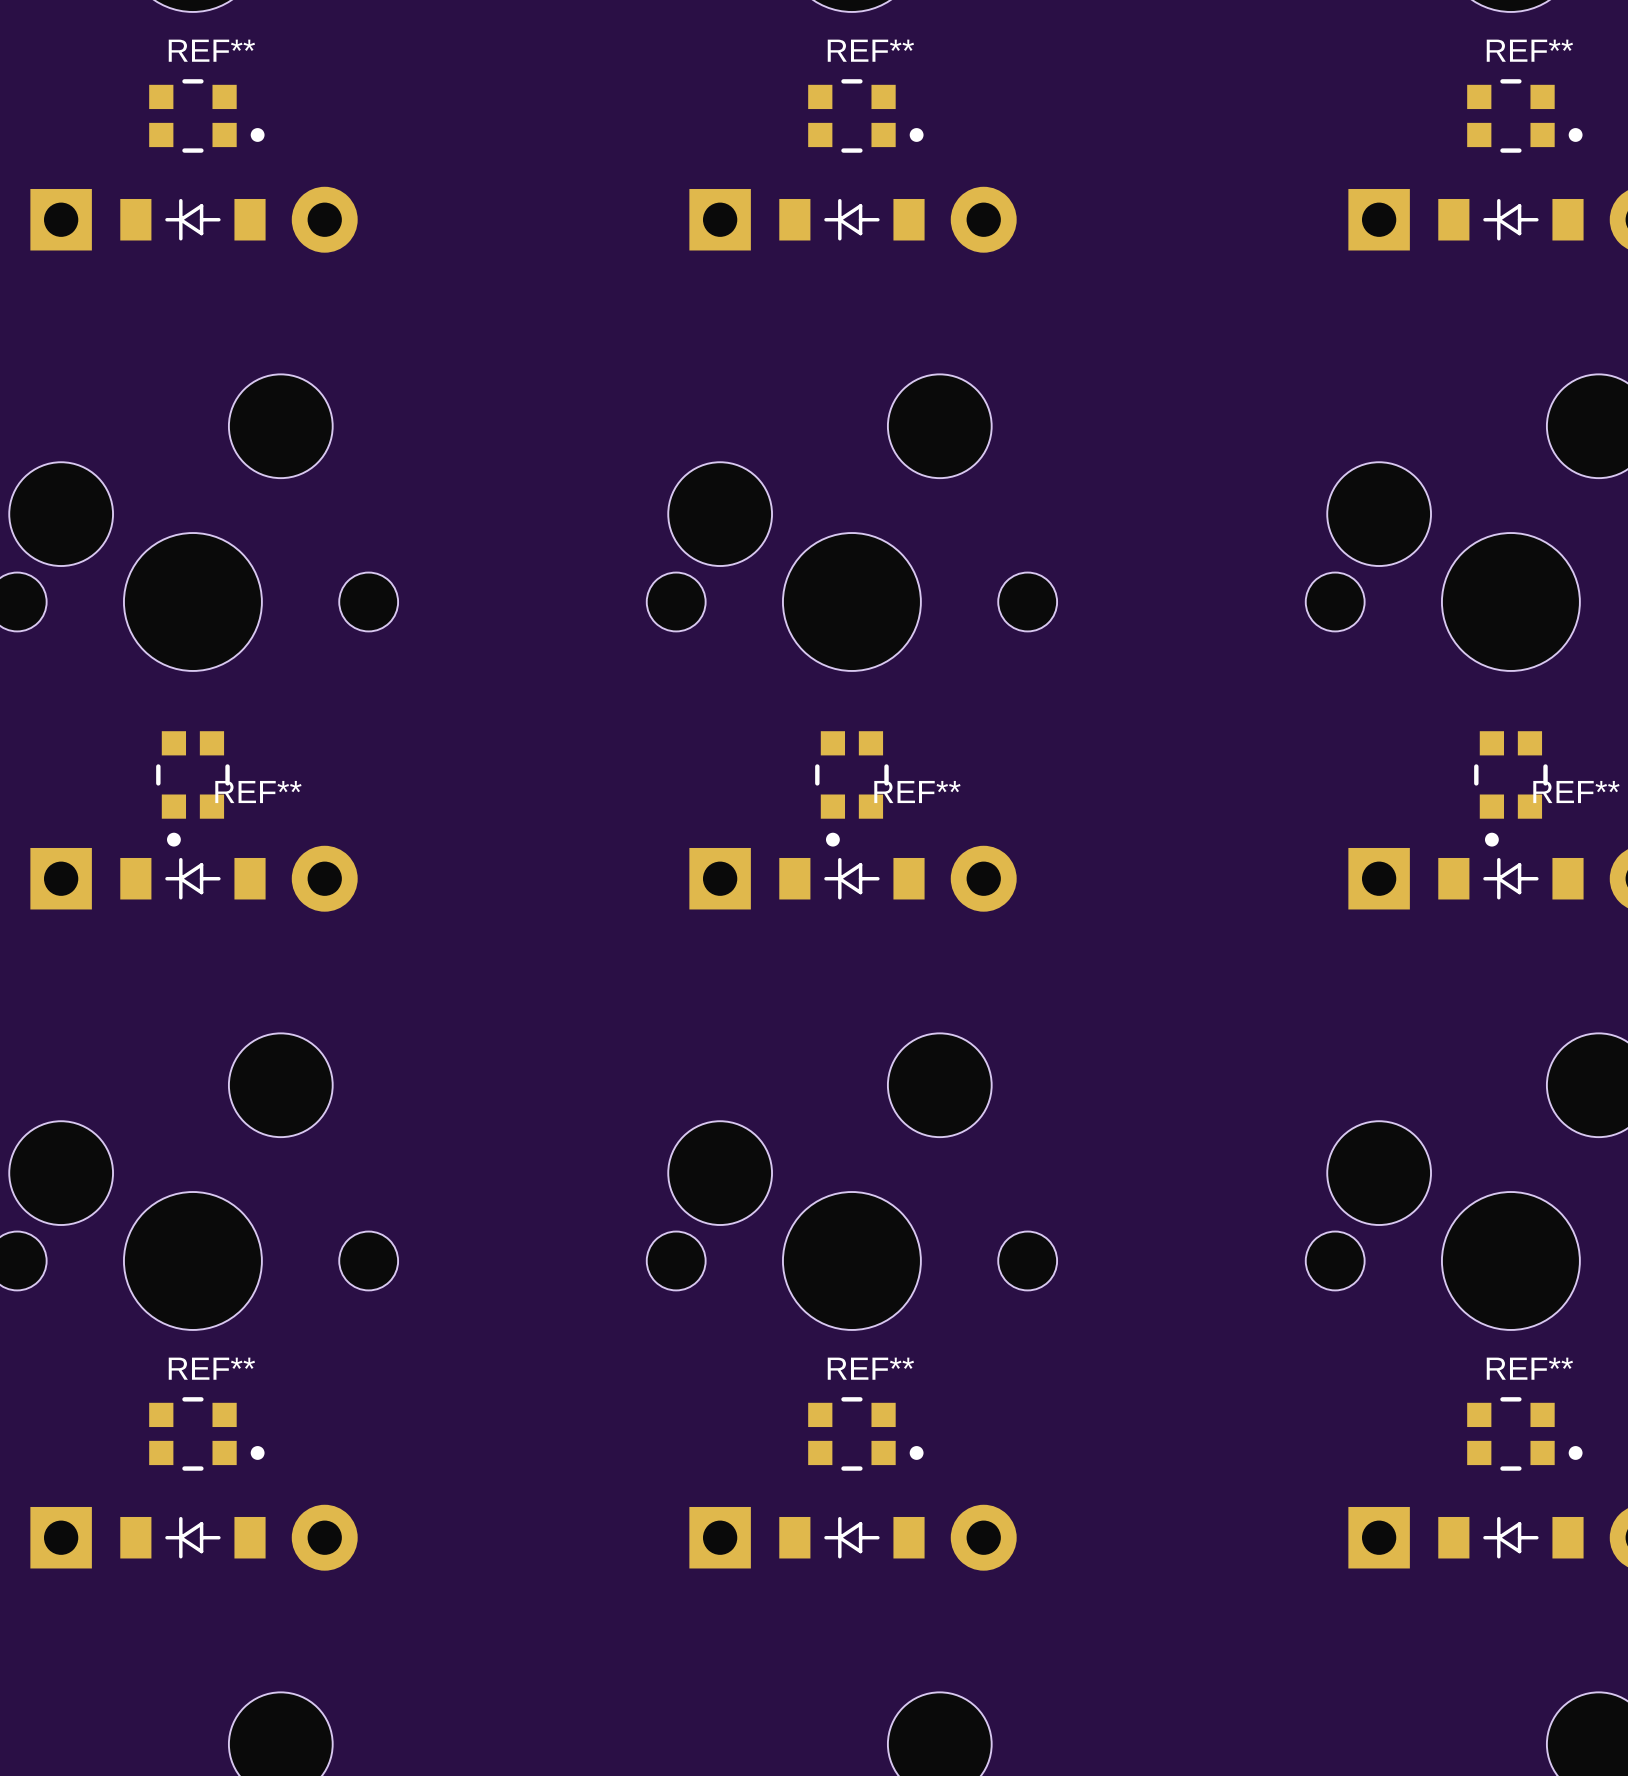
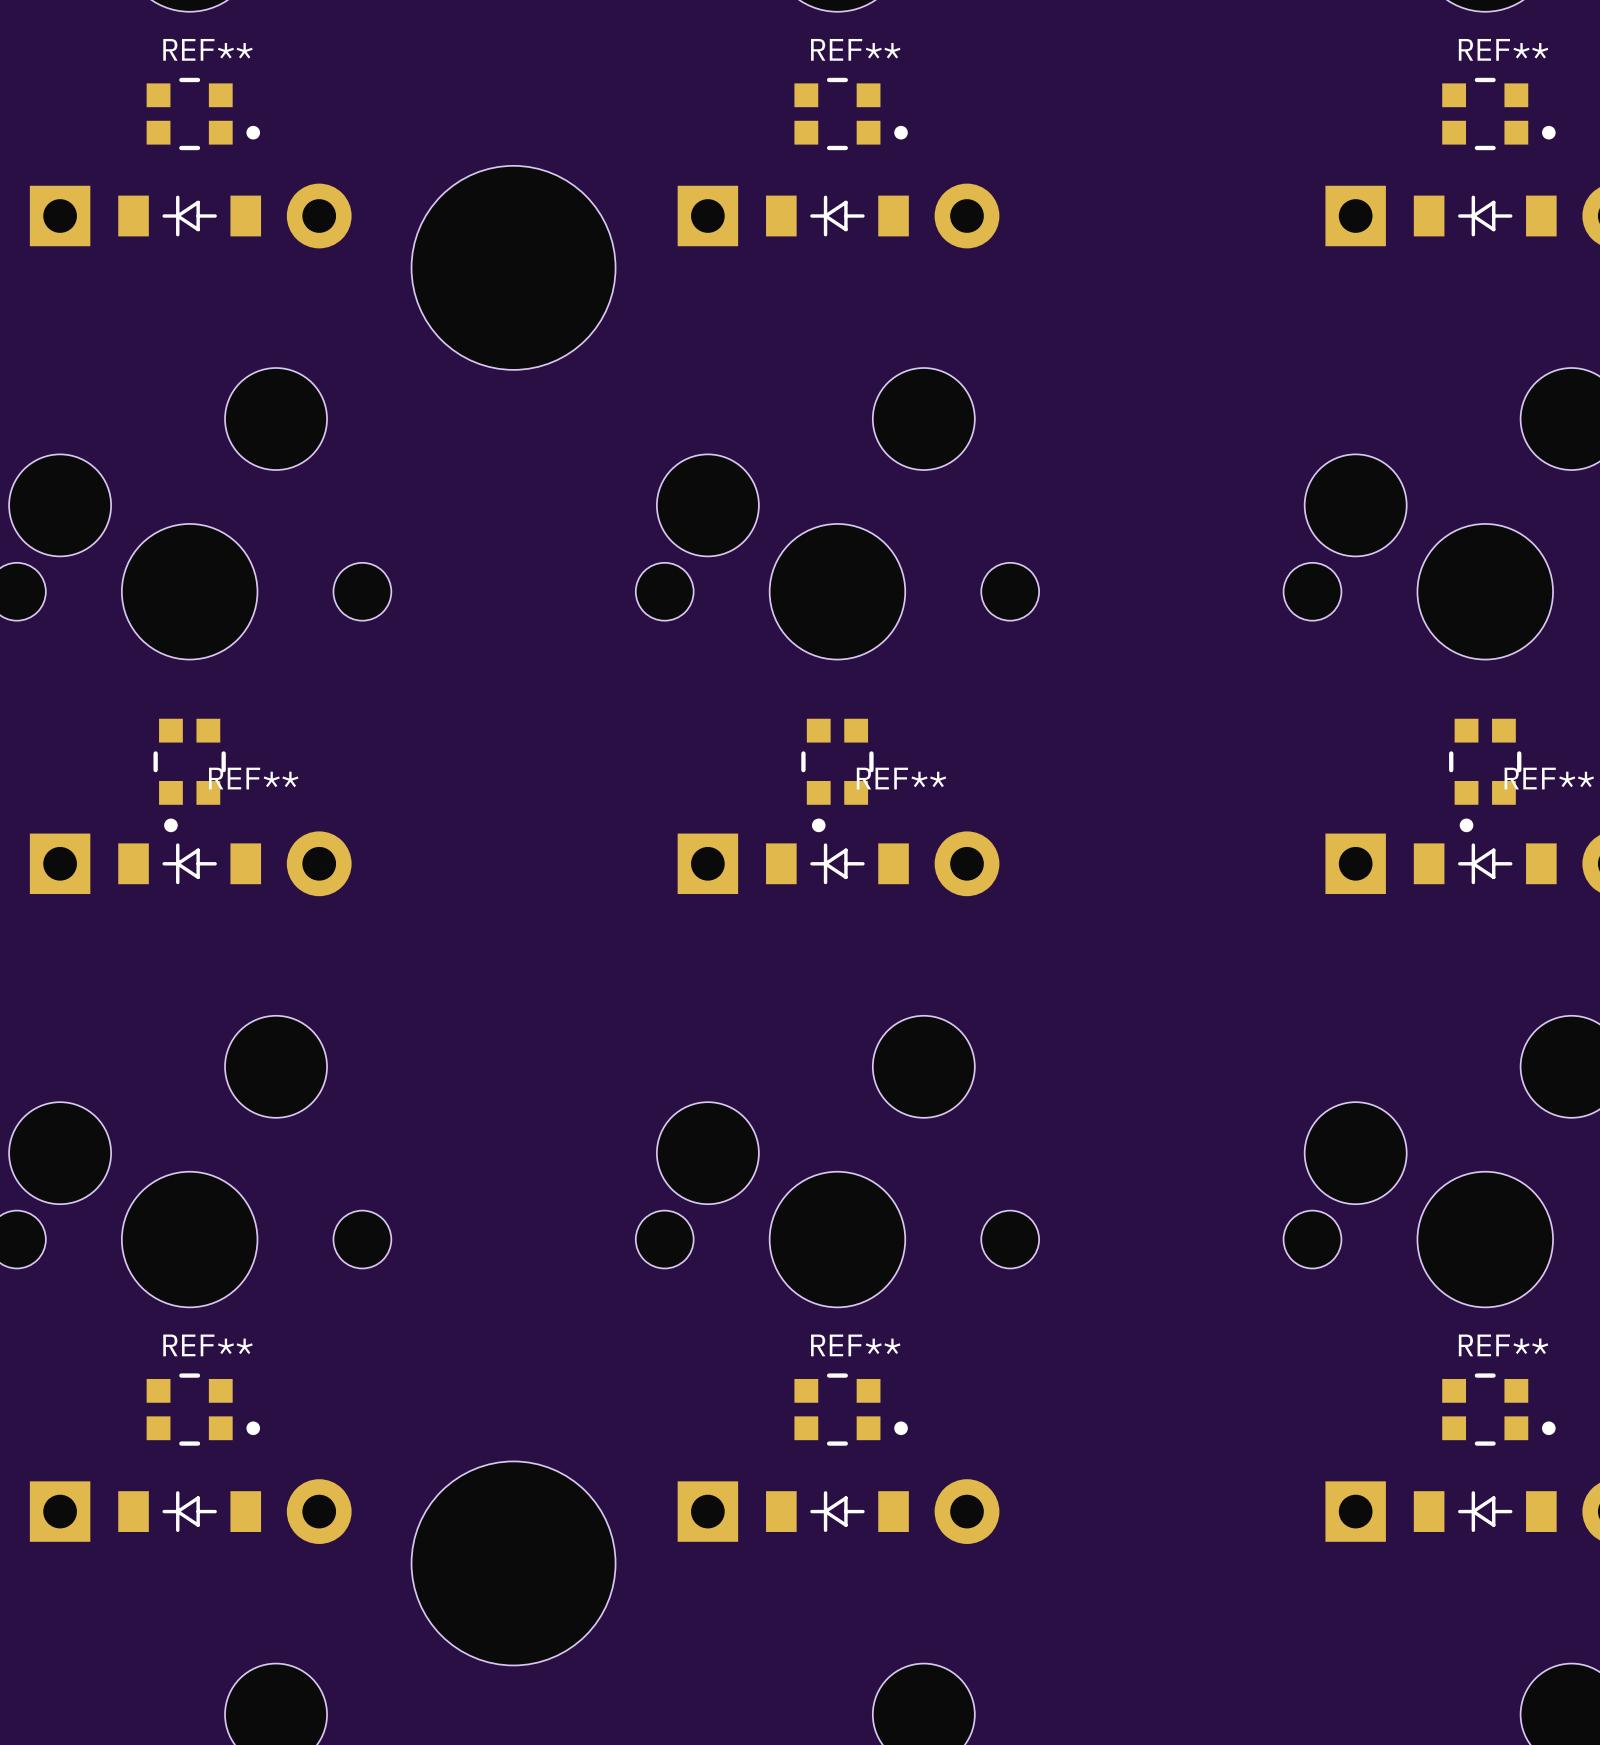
part: none -> (513, 267)
part: none -> (513, 1563)

